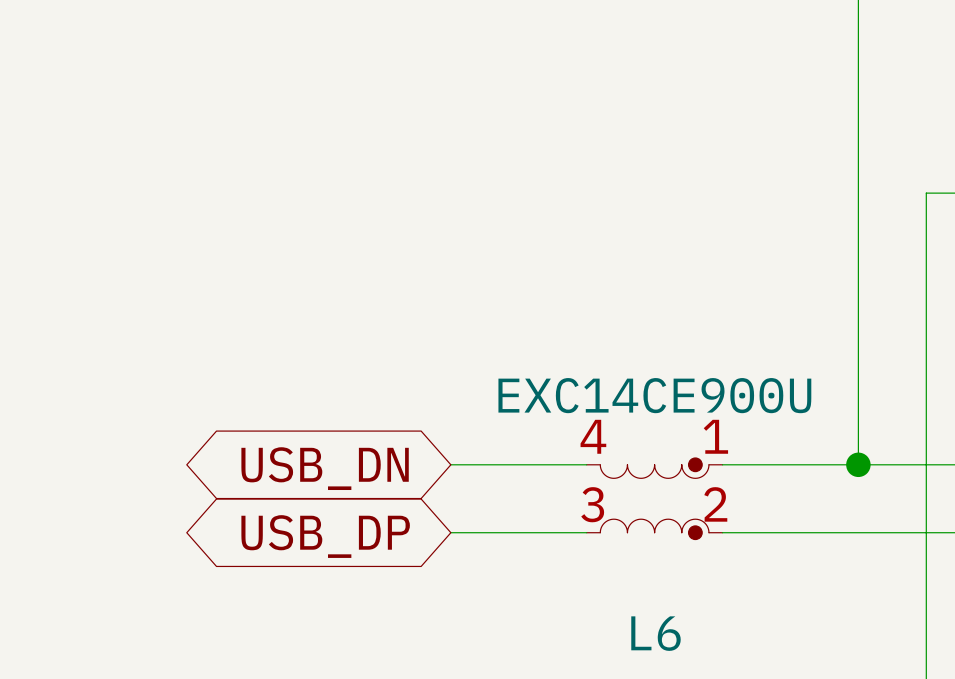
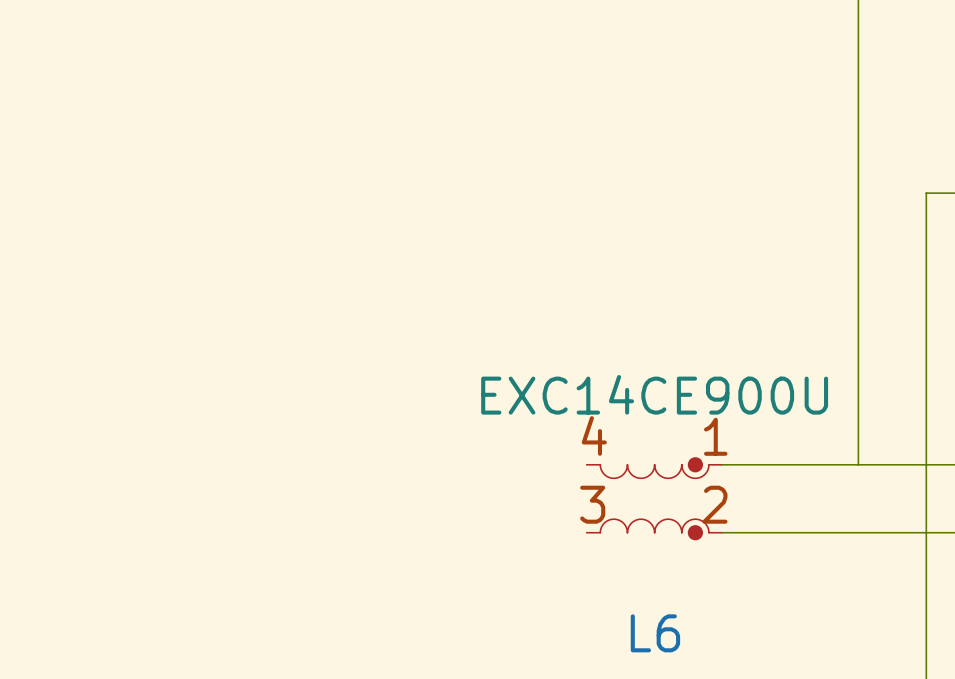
wire: (450, 464) (586, 464) -> none
junction: (858, 464) -> none
global label: USB_DN (325, 468) -> none
wire: (450, 532) (586, 532) -> none
global label: USB_DP (325, 536) -> none

